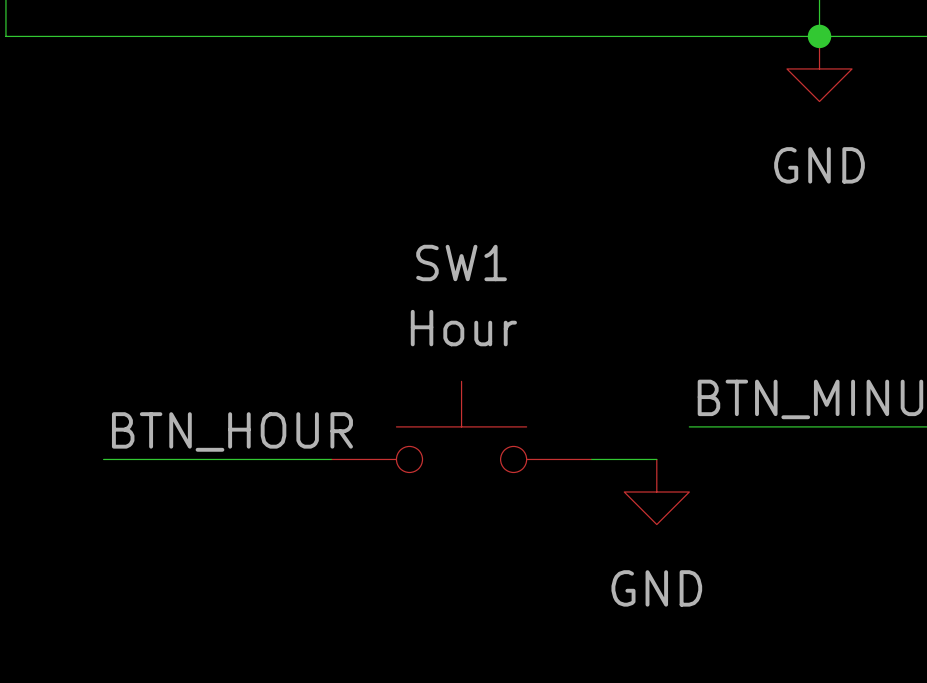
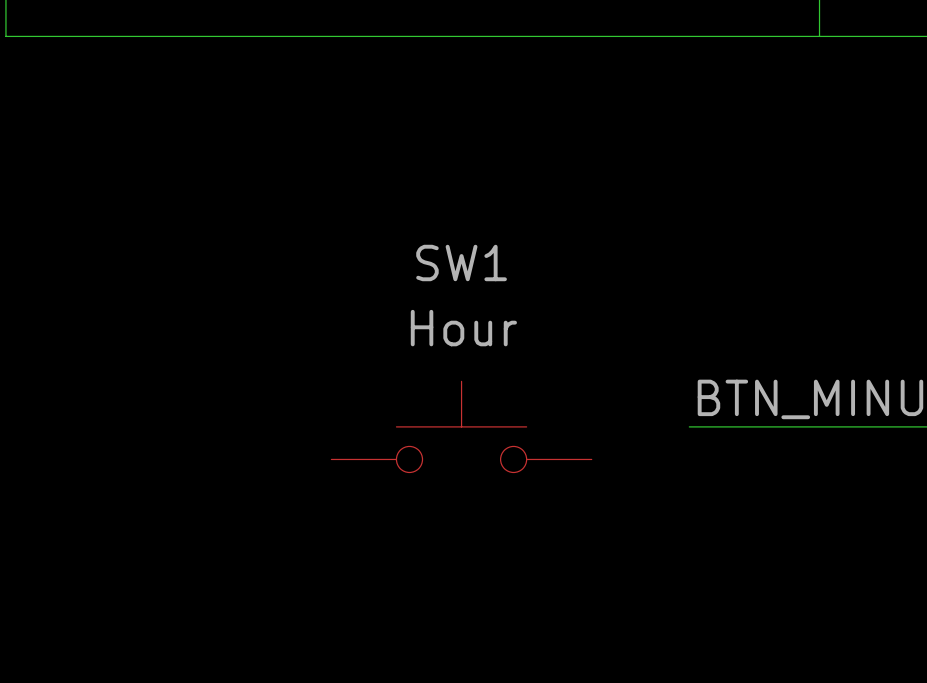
junction: (819, 36) -> none
power symbol: GND (819, 68) -> none
label: BTN_HOUR (232, 431) -> none
wire: (103, 459) (331, 459) -> none
wire: (591, 459) (656, 459) -> none
power symbol: GND (656, 492) -> none

